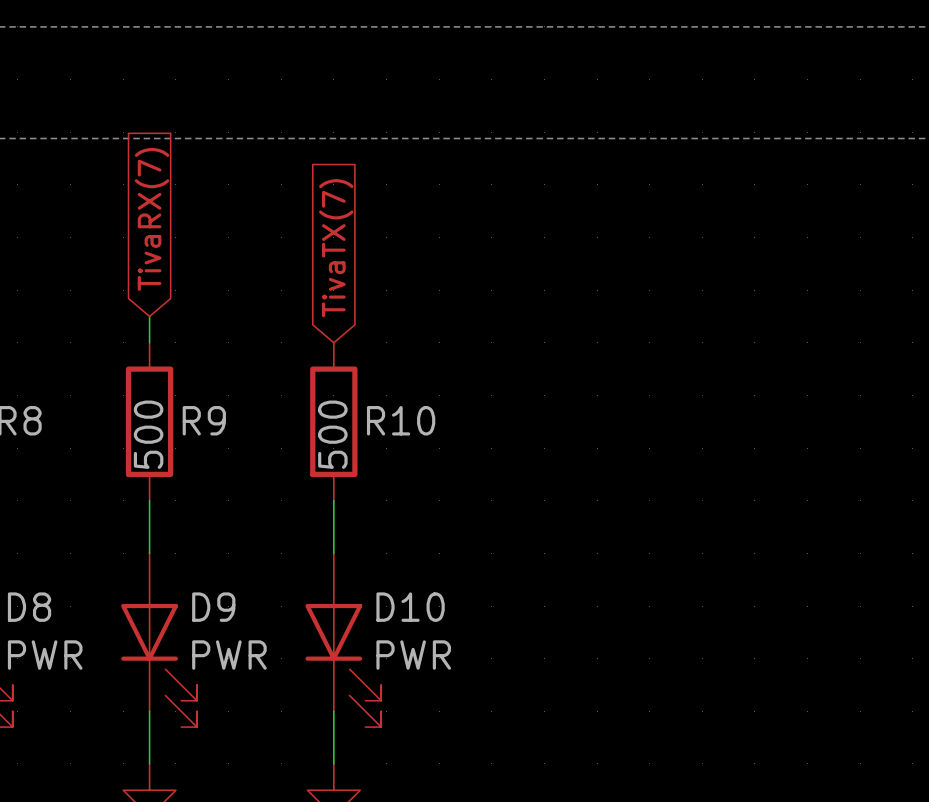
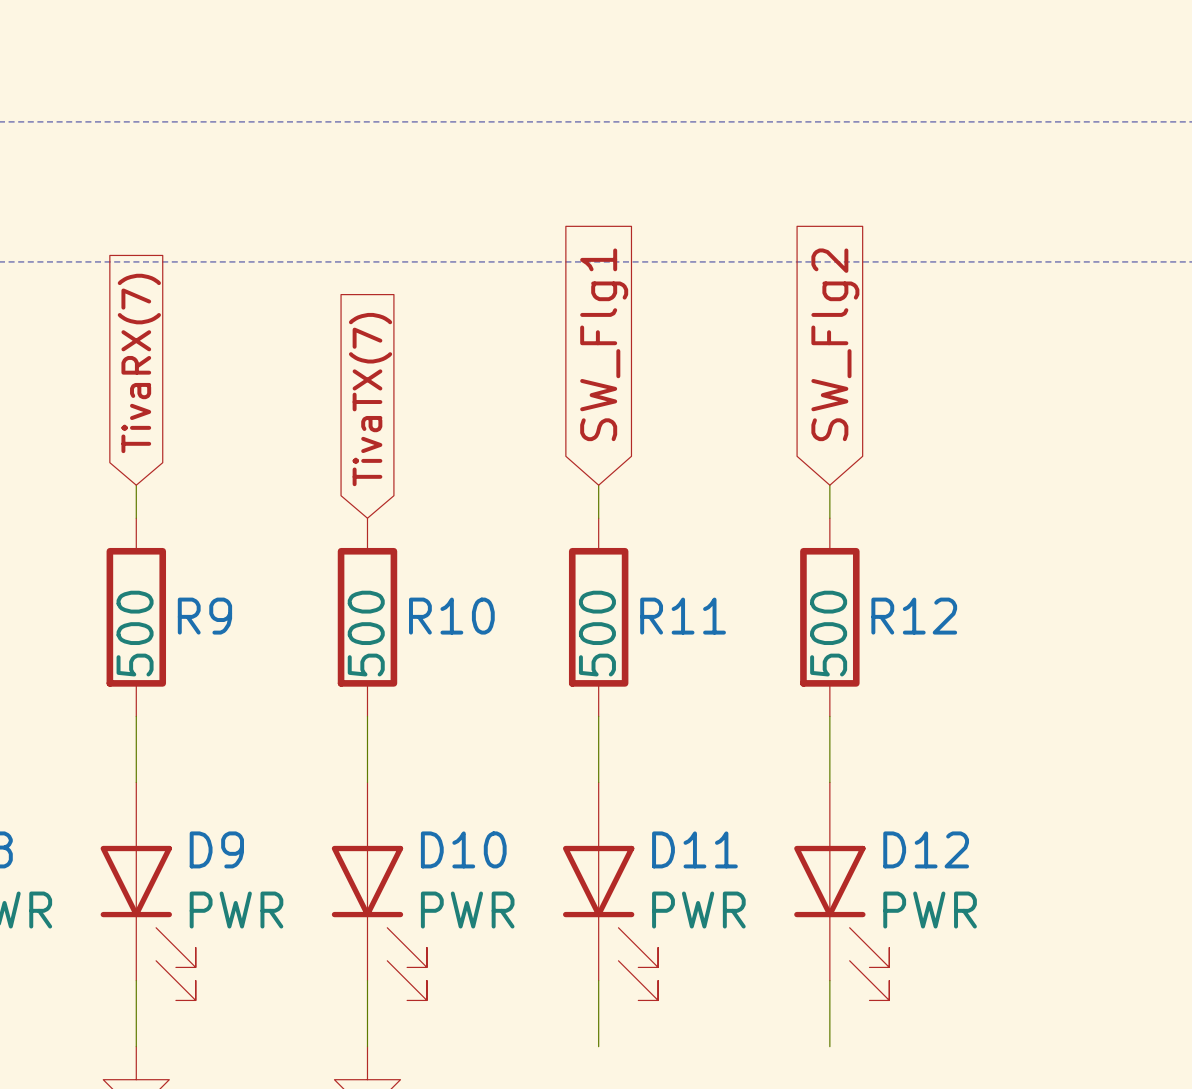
global label: none -> SW_Flg1 (604, 344)
global label: none -> SW_Flg2 (835, 344)
wire: none -> (598, 485) (598, 518)
wire: none -> (829, 485) (829, 518)
R11: none -> 500 (598, 617)
R12: none -> 500 (829, 617)
wire: none -> (598, 716) (598, 782)
wire: none -> (829, 716) (829, 782)
D11: none -> PWR (610, 891)
D12: none -> PWR (841, 891)
wire: none -> (598, 980) (598, 1046)
wire: none -> (829, 980) (829, 1046)

